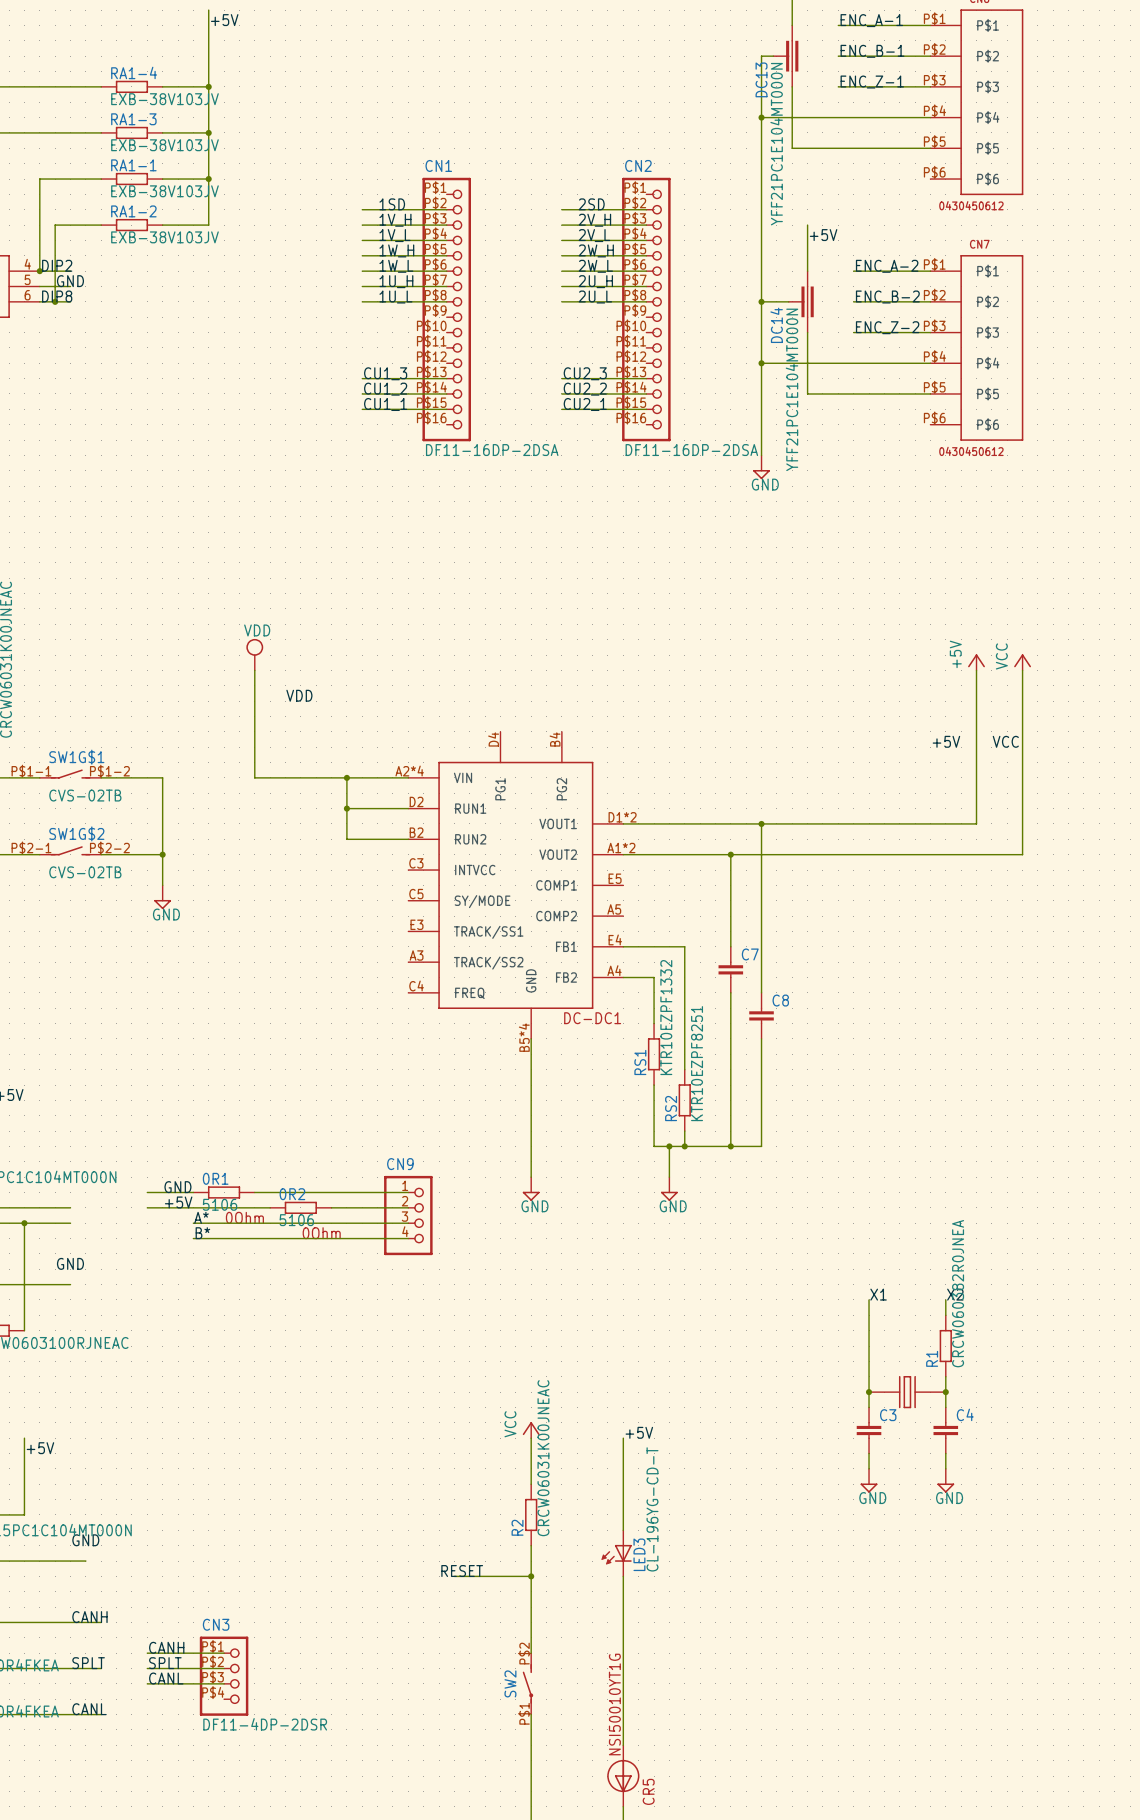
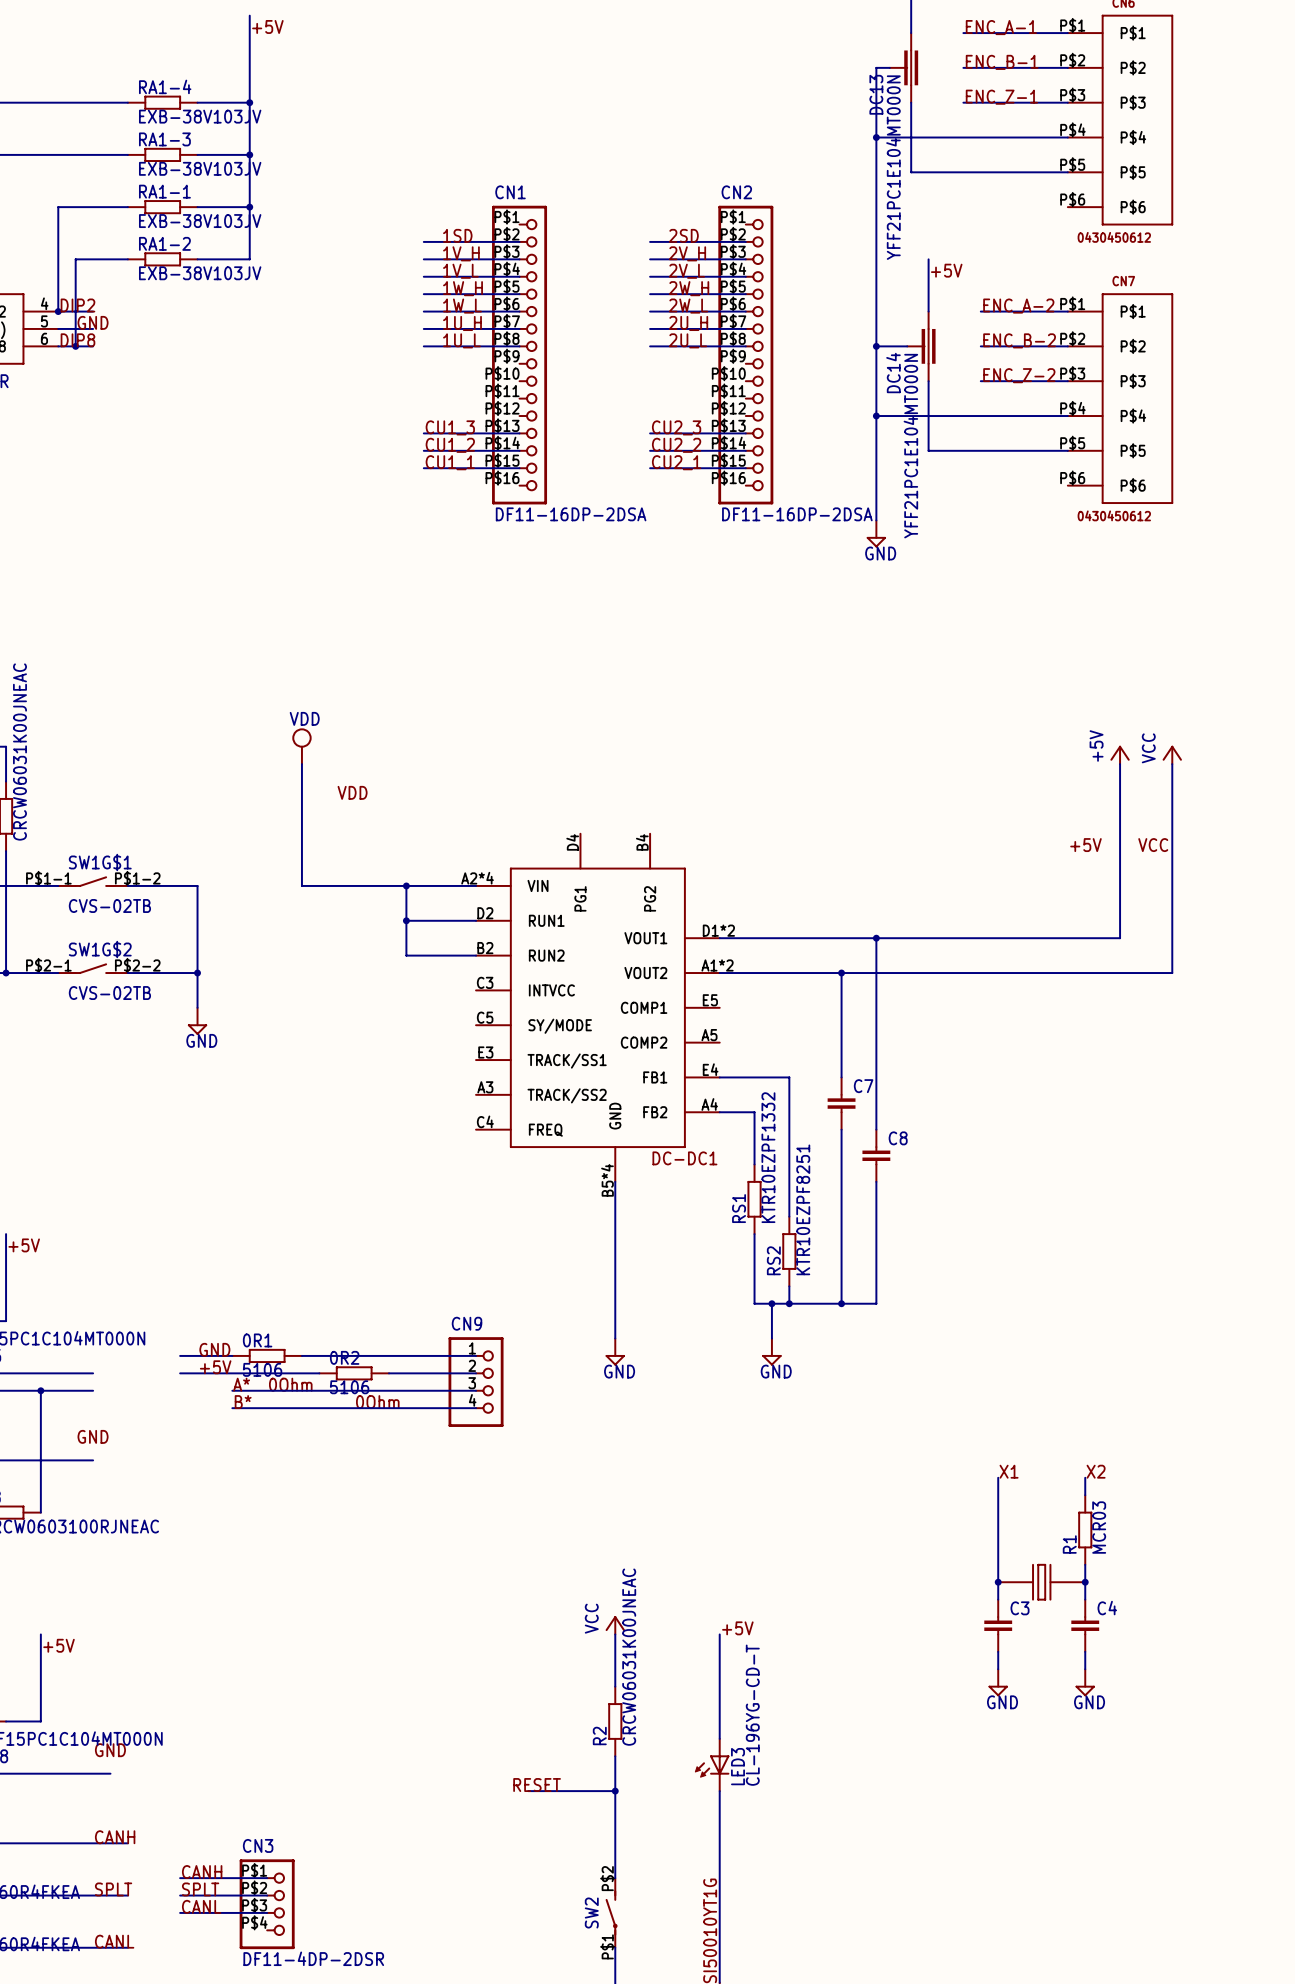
R1 value: CRCW060382R0JNEA (958, 1293) -> MCR03 (1099, 1527)

